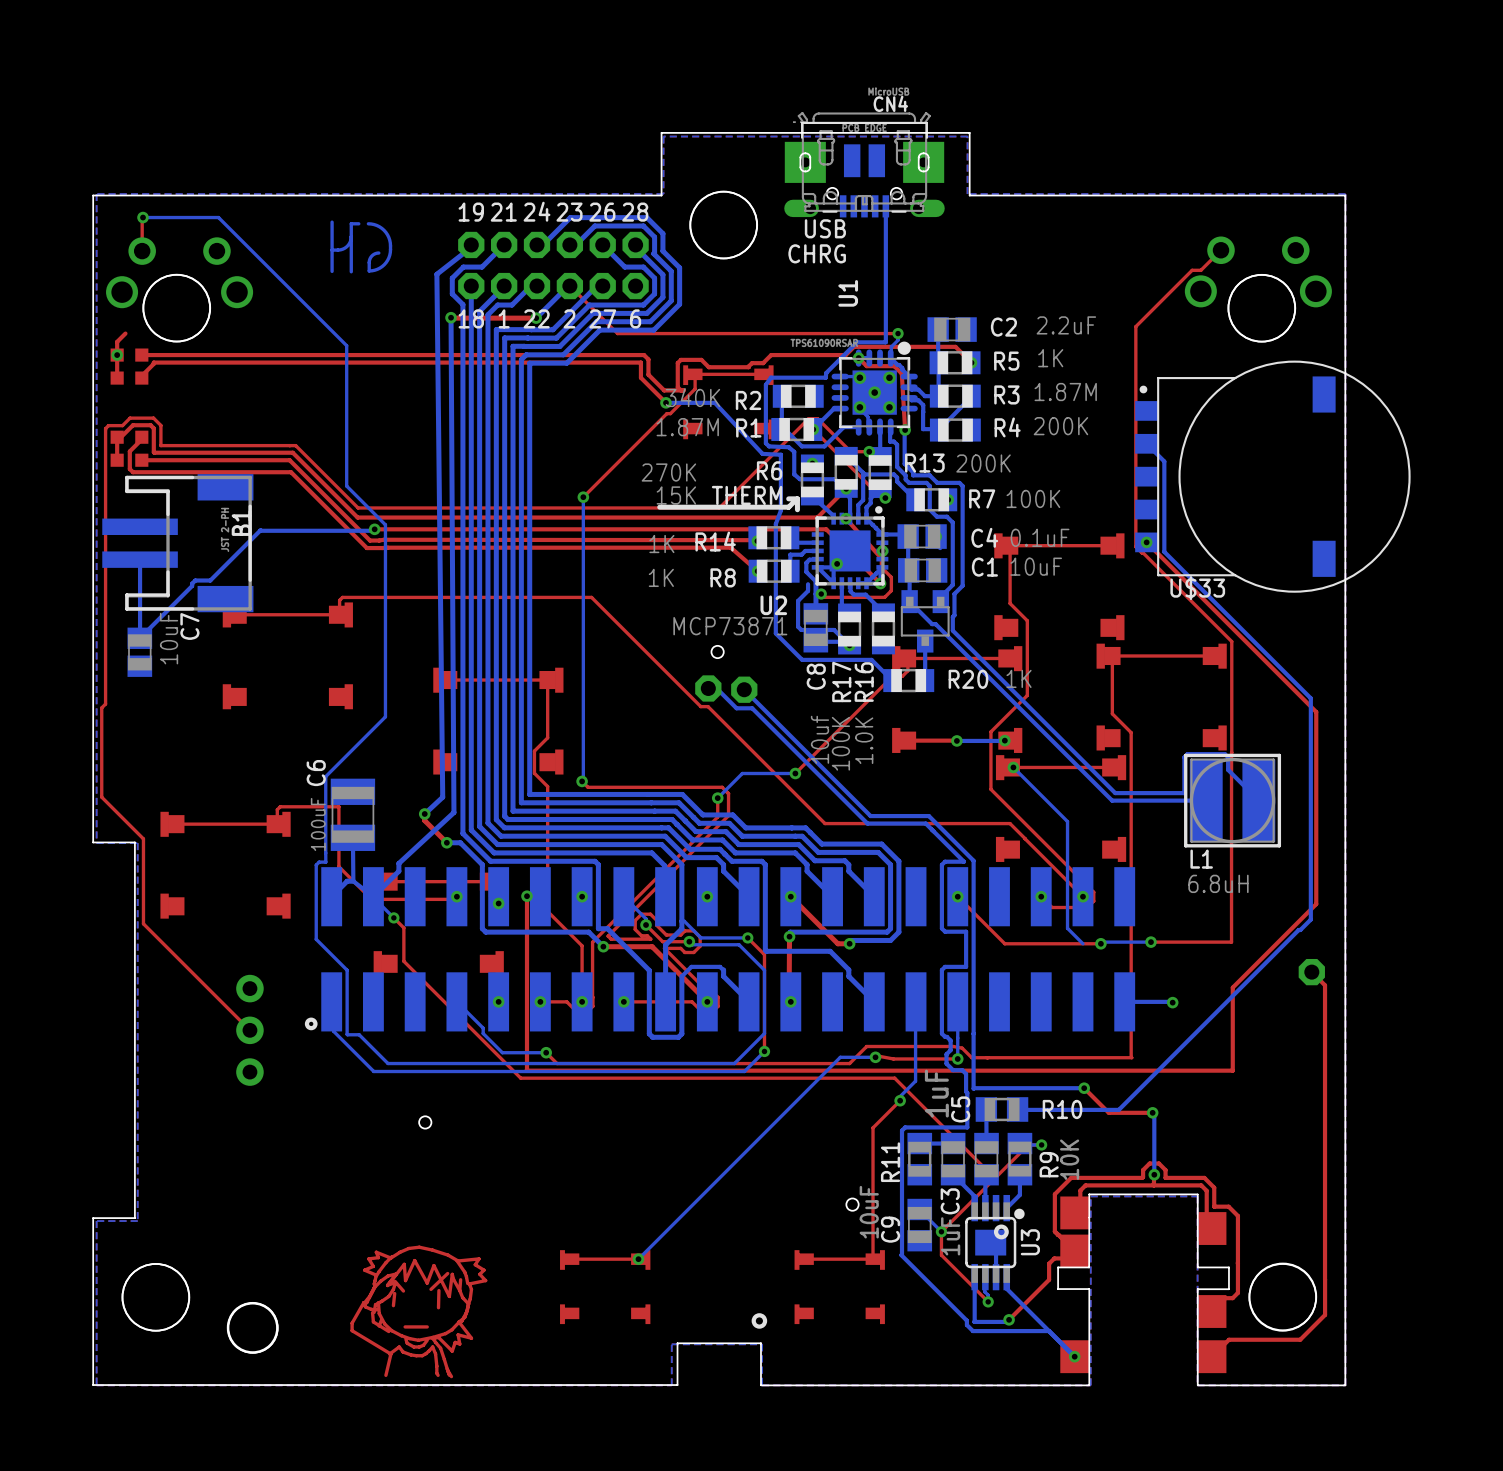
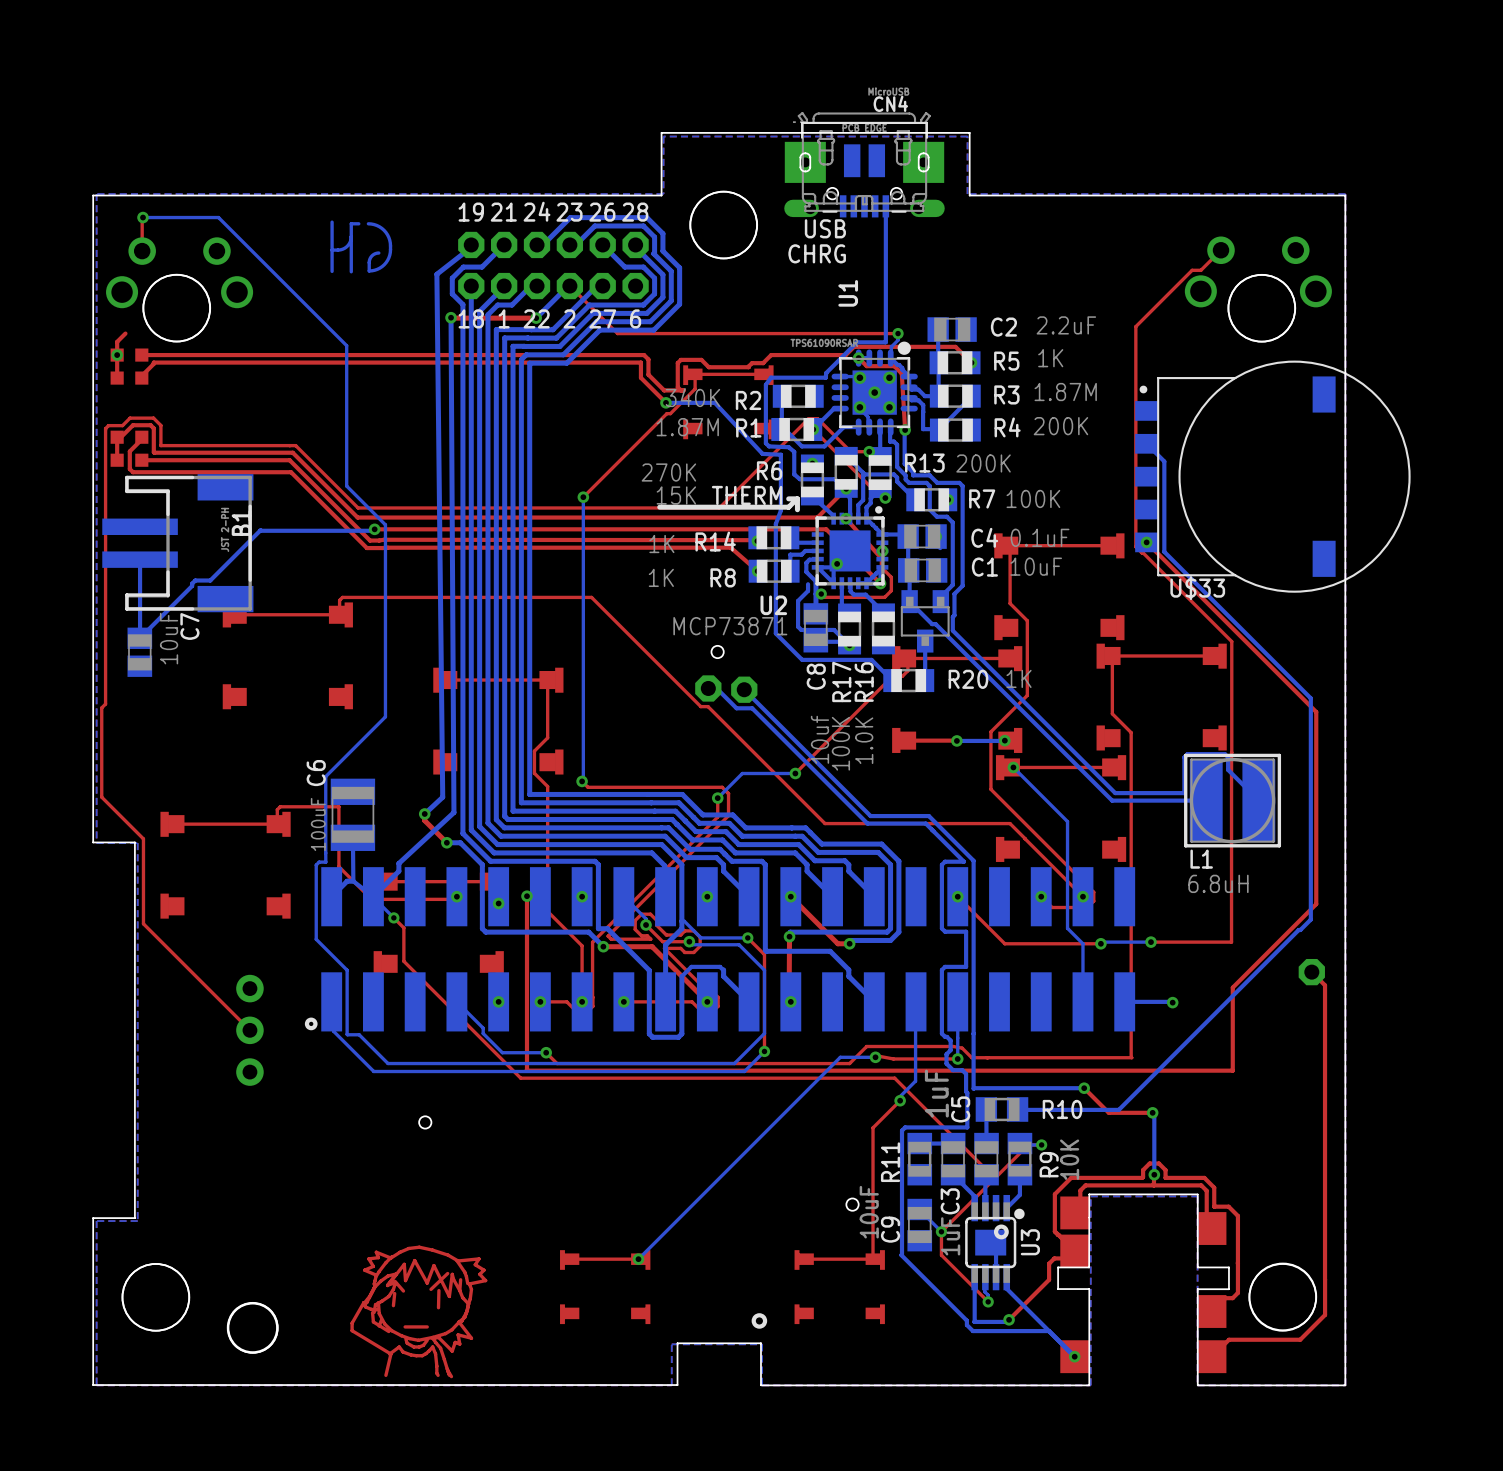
bottom track: none -> (1082, 943) (1082, 1001)

